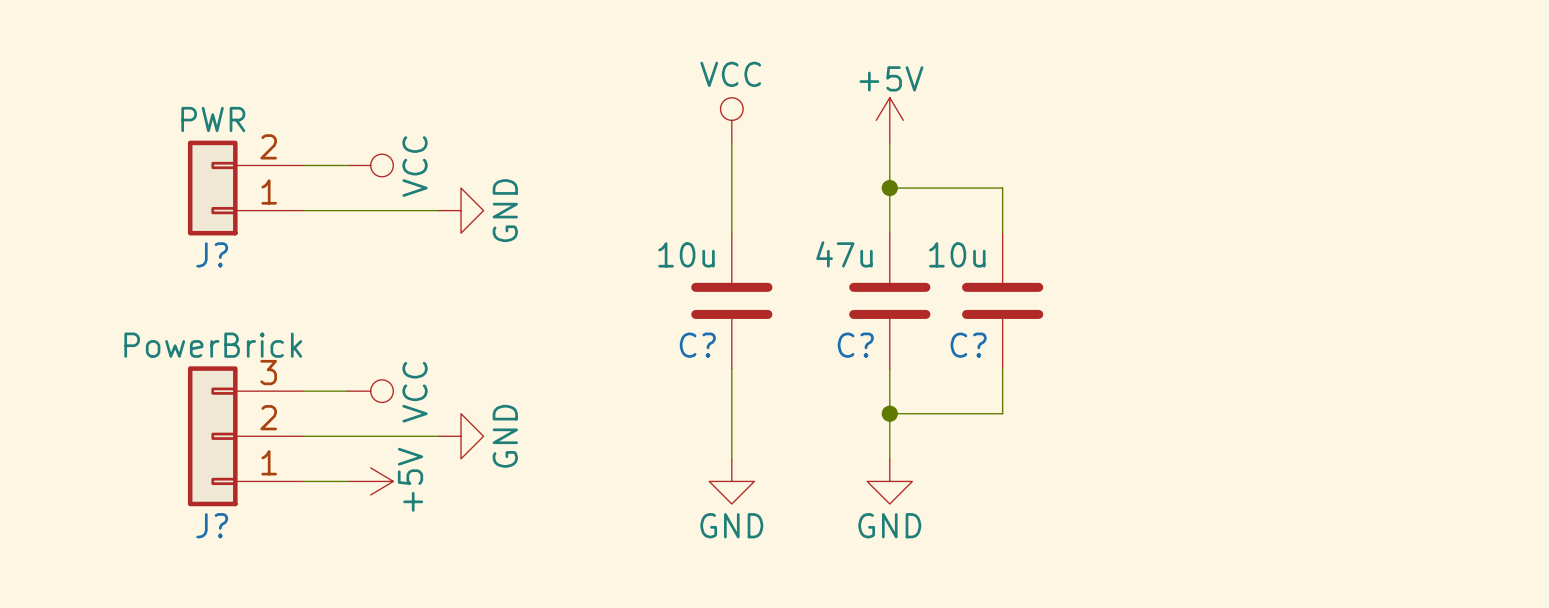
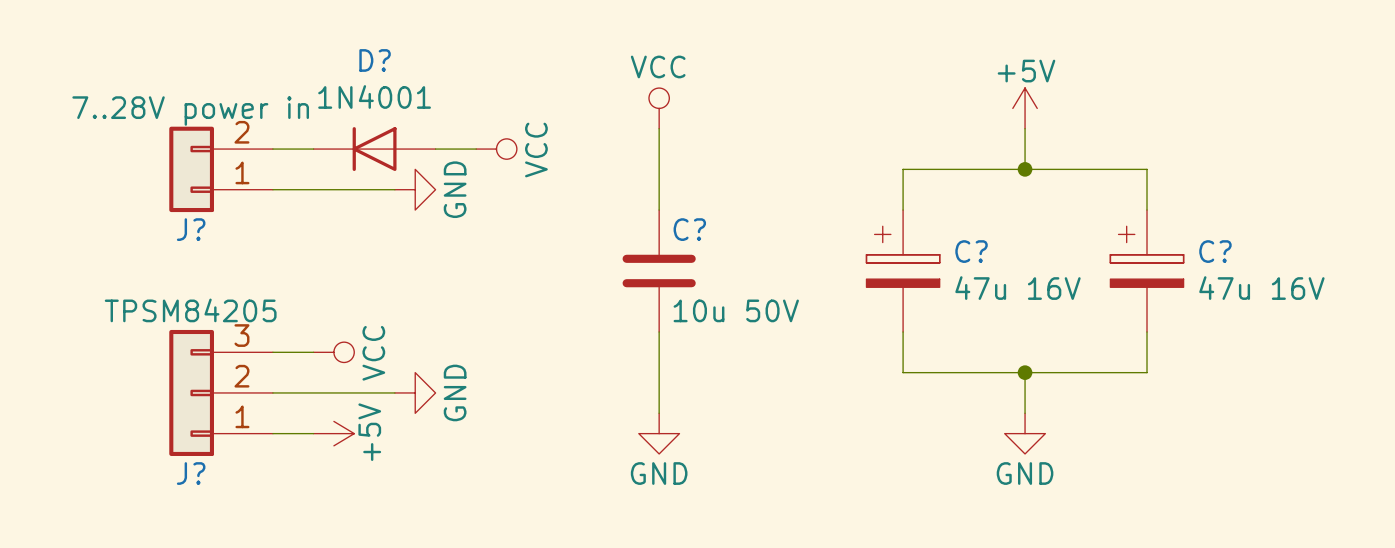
J? value: PWR (213, 119) -> 7..28V power in (190, 111)
power symbol position: +5V (889, 120) -> +5V (1025, 108)
wire: (889, 142) (889, 233) -> none
wire: none -> (1025, 128) (1025, 169)
power symbol position: VCC (370, 165) -> VCC (496, 149)
D?: none -> 1N4001 (374, 149)
wire: none -> (435, 149) (476, 149)
wire: (889, 188) (1002, 188) -> (1147, 210) (1147, 169) (903, 169)
junction: (889, 188) -> none
junction: none -> (1025, 169)
C? symbol: [962, 233, 1044, 369] -> [866, 210, 940, 332]
C? value: 10u (686, 254) -> 10u 50V (736, 310)
C? value: 10u (957, 254) -> 47u 16V (1017, 288)
C?: 47u (889, 300) -> none
C?: none -> 47u 16V (1147, 271)
J? value: PowerBrick (213, 345) -> TPSM84205 (190, 310)
C? name position: C? (697, 345) -> C? (689, 229)
C? name position: C? (968, 345) -> C? (971, 251)
wire: (889, 368) (889, 458) -> none
wire: (889, 413) (1002, 413) -> (1147, 331) (1147, 372) (903, 372)
junction: (889, 413) -> none
wire: none -> (1025, 372) (1025, 413)
junction: none -> (1025, 372)
power symbol position: GND (889, 481) -> GND (1025, 433)

